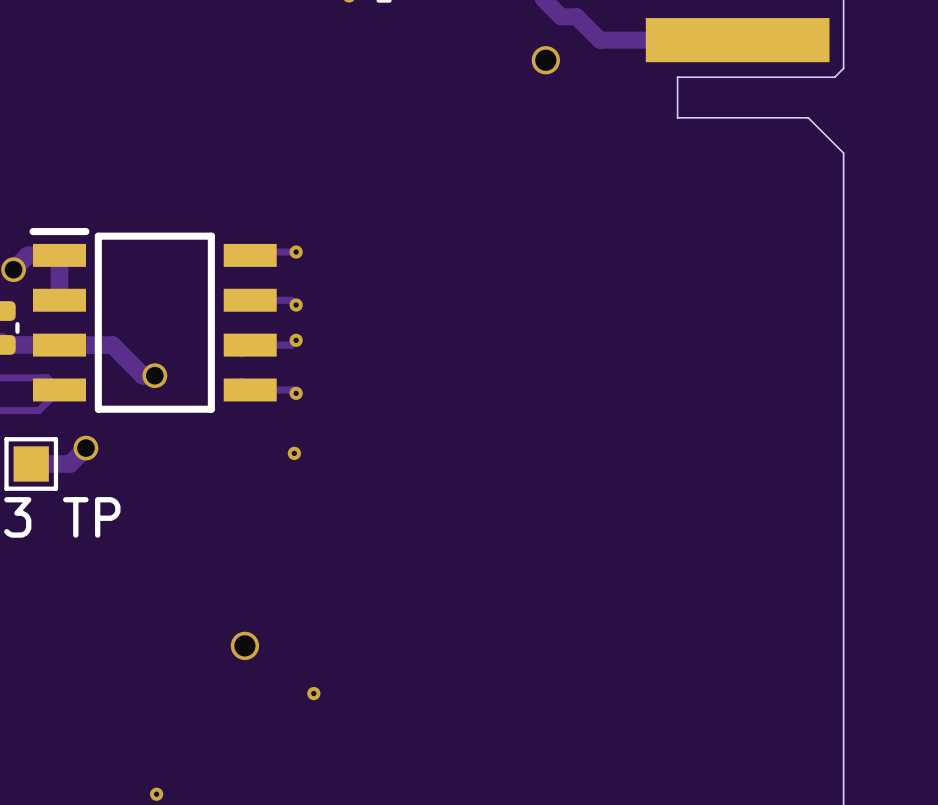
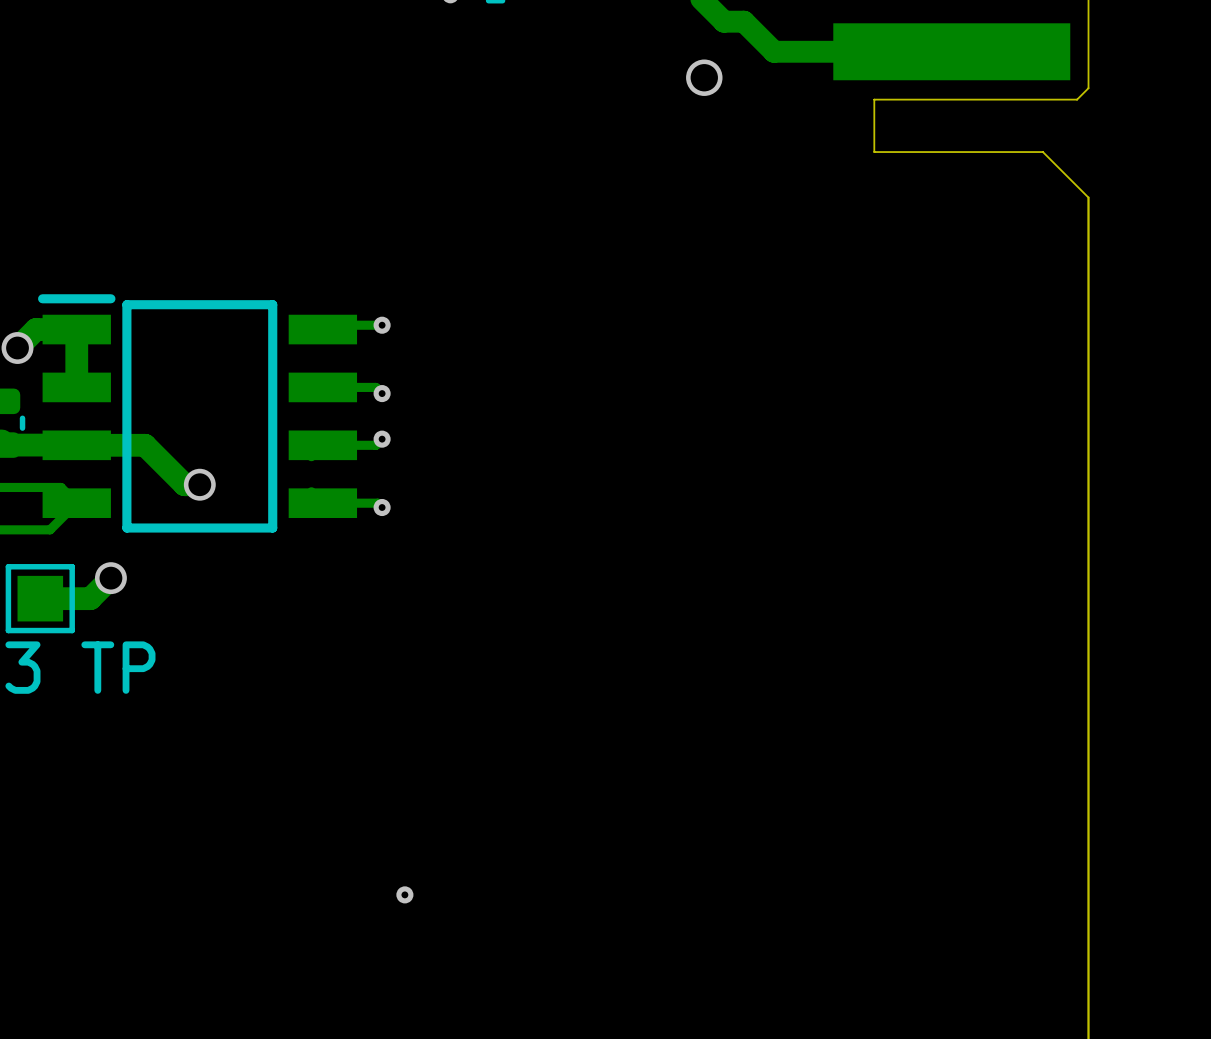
via: (294, 453) -> none
via: (244, 645) -> none
via: (156, 794) -> none

